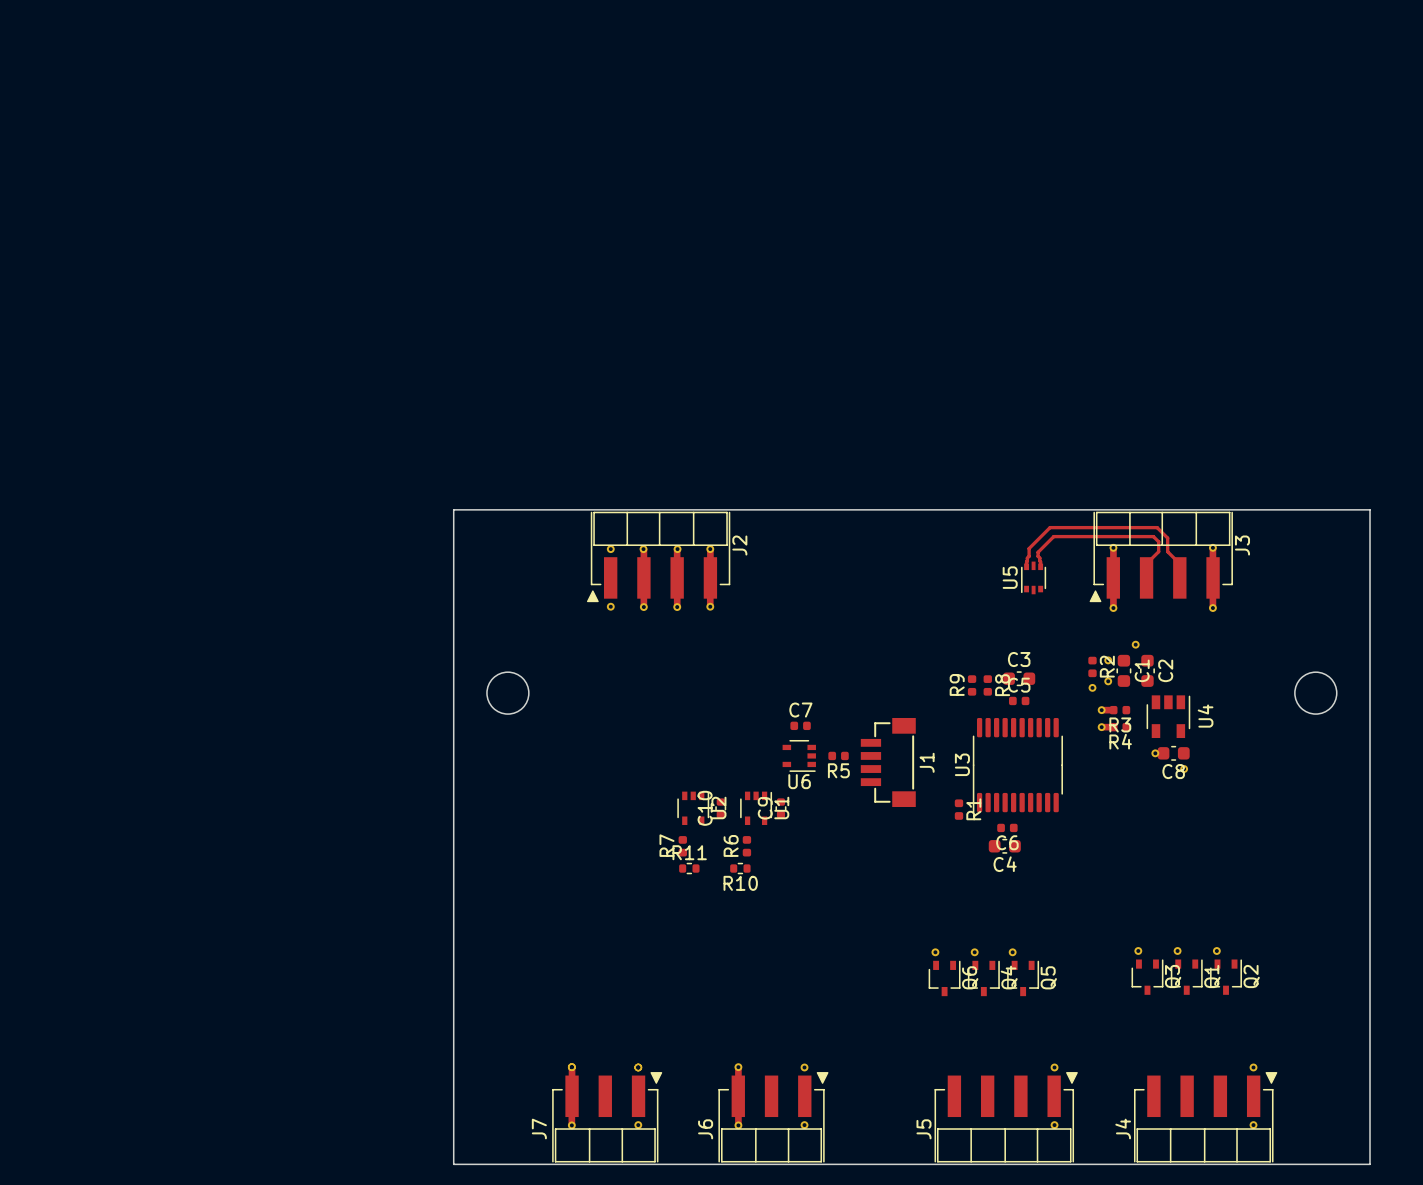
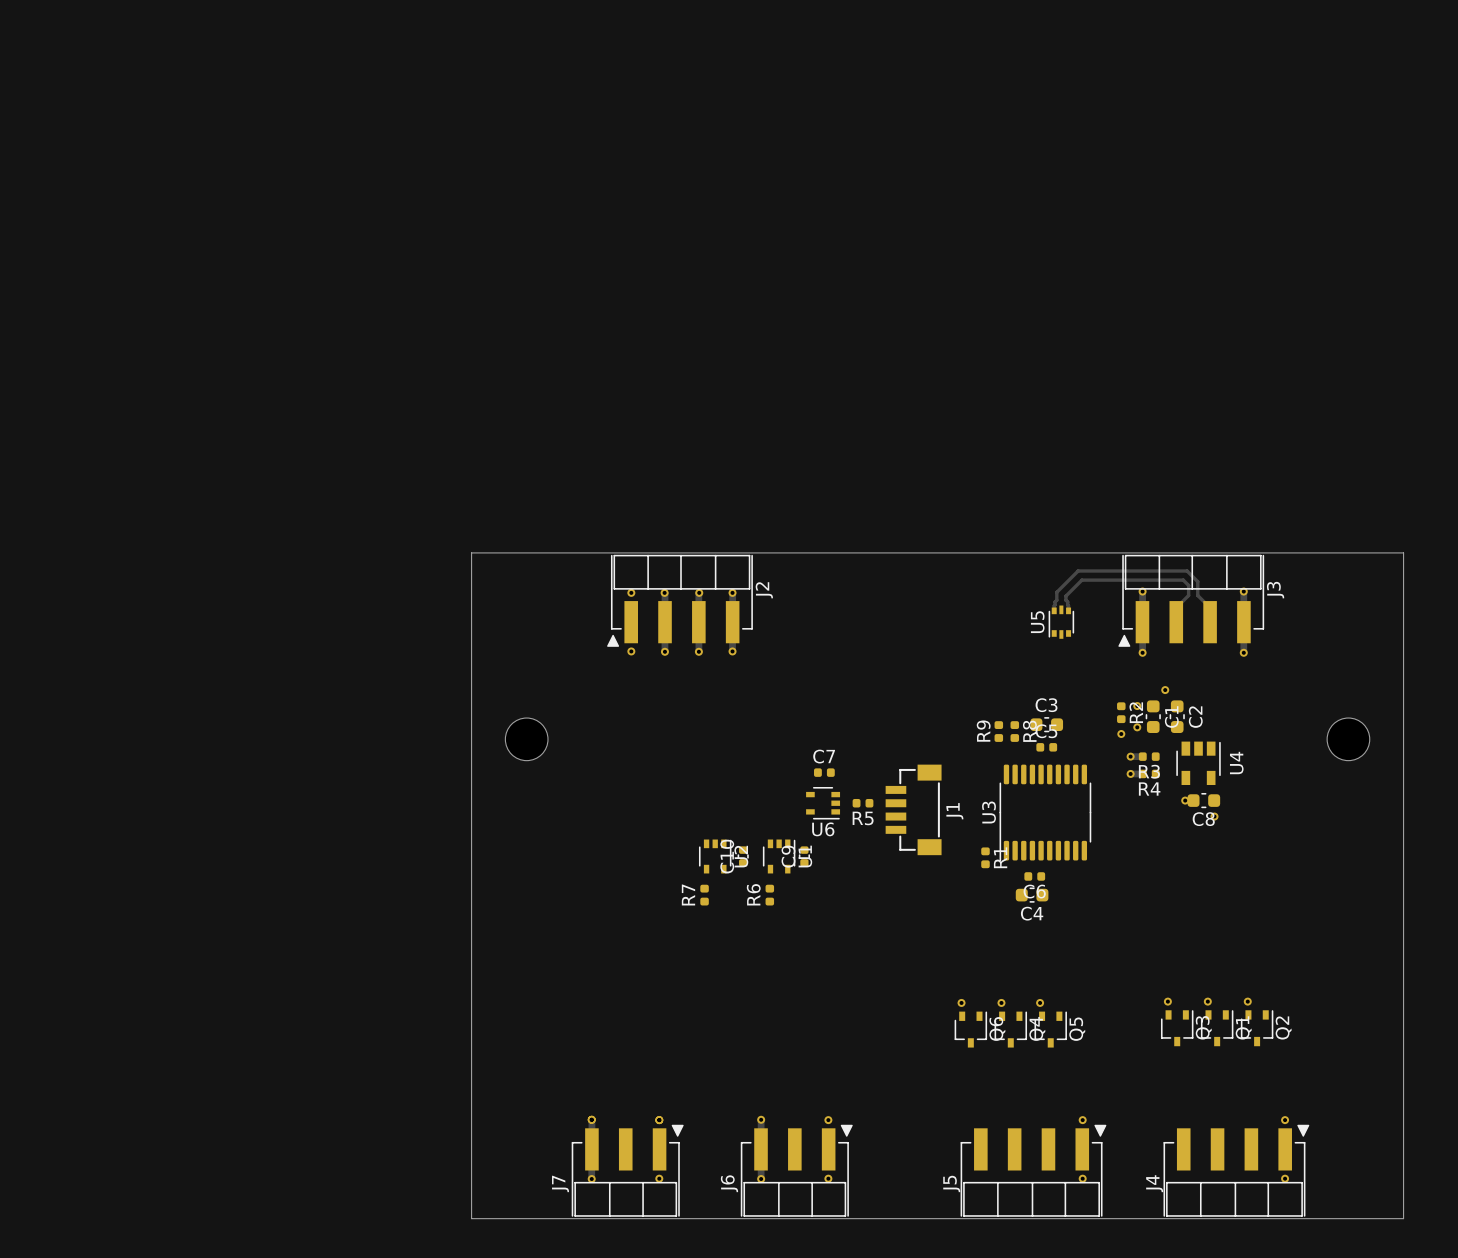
R11: (689, 868) -> none
R10: (740, 868) -> none

